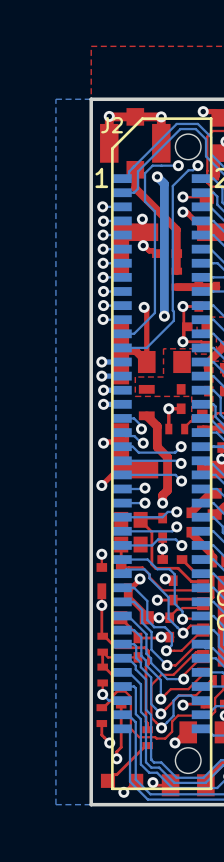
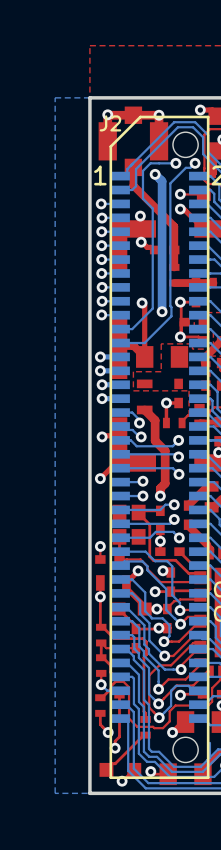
bottom track: none -> (209, 742) (209, 757)

